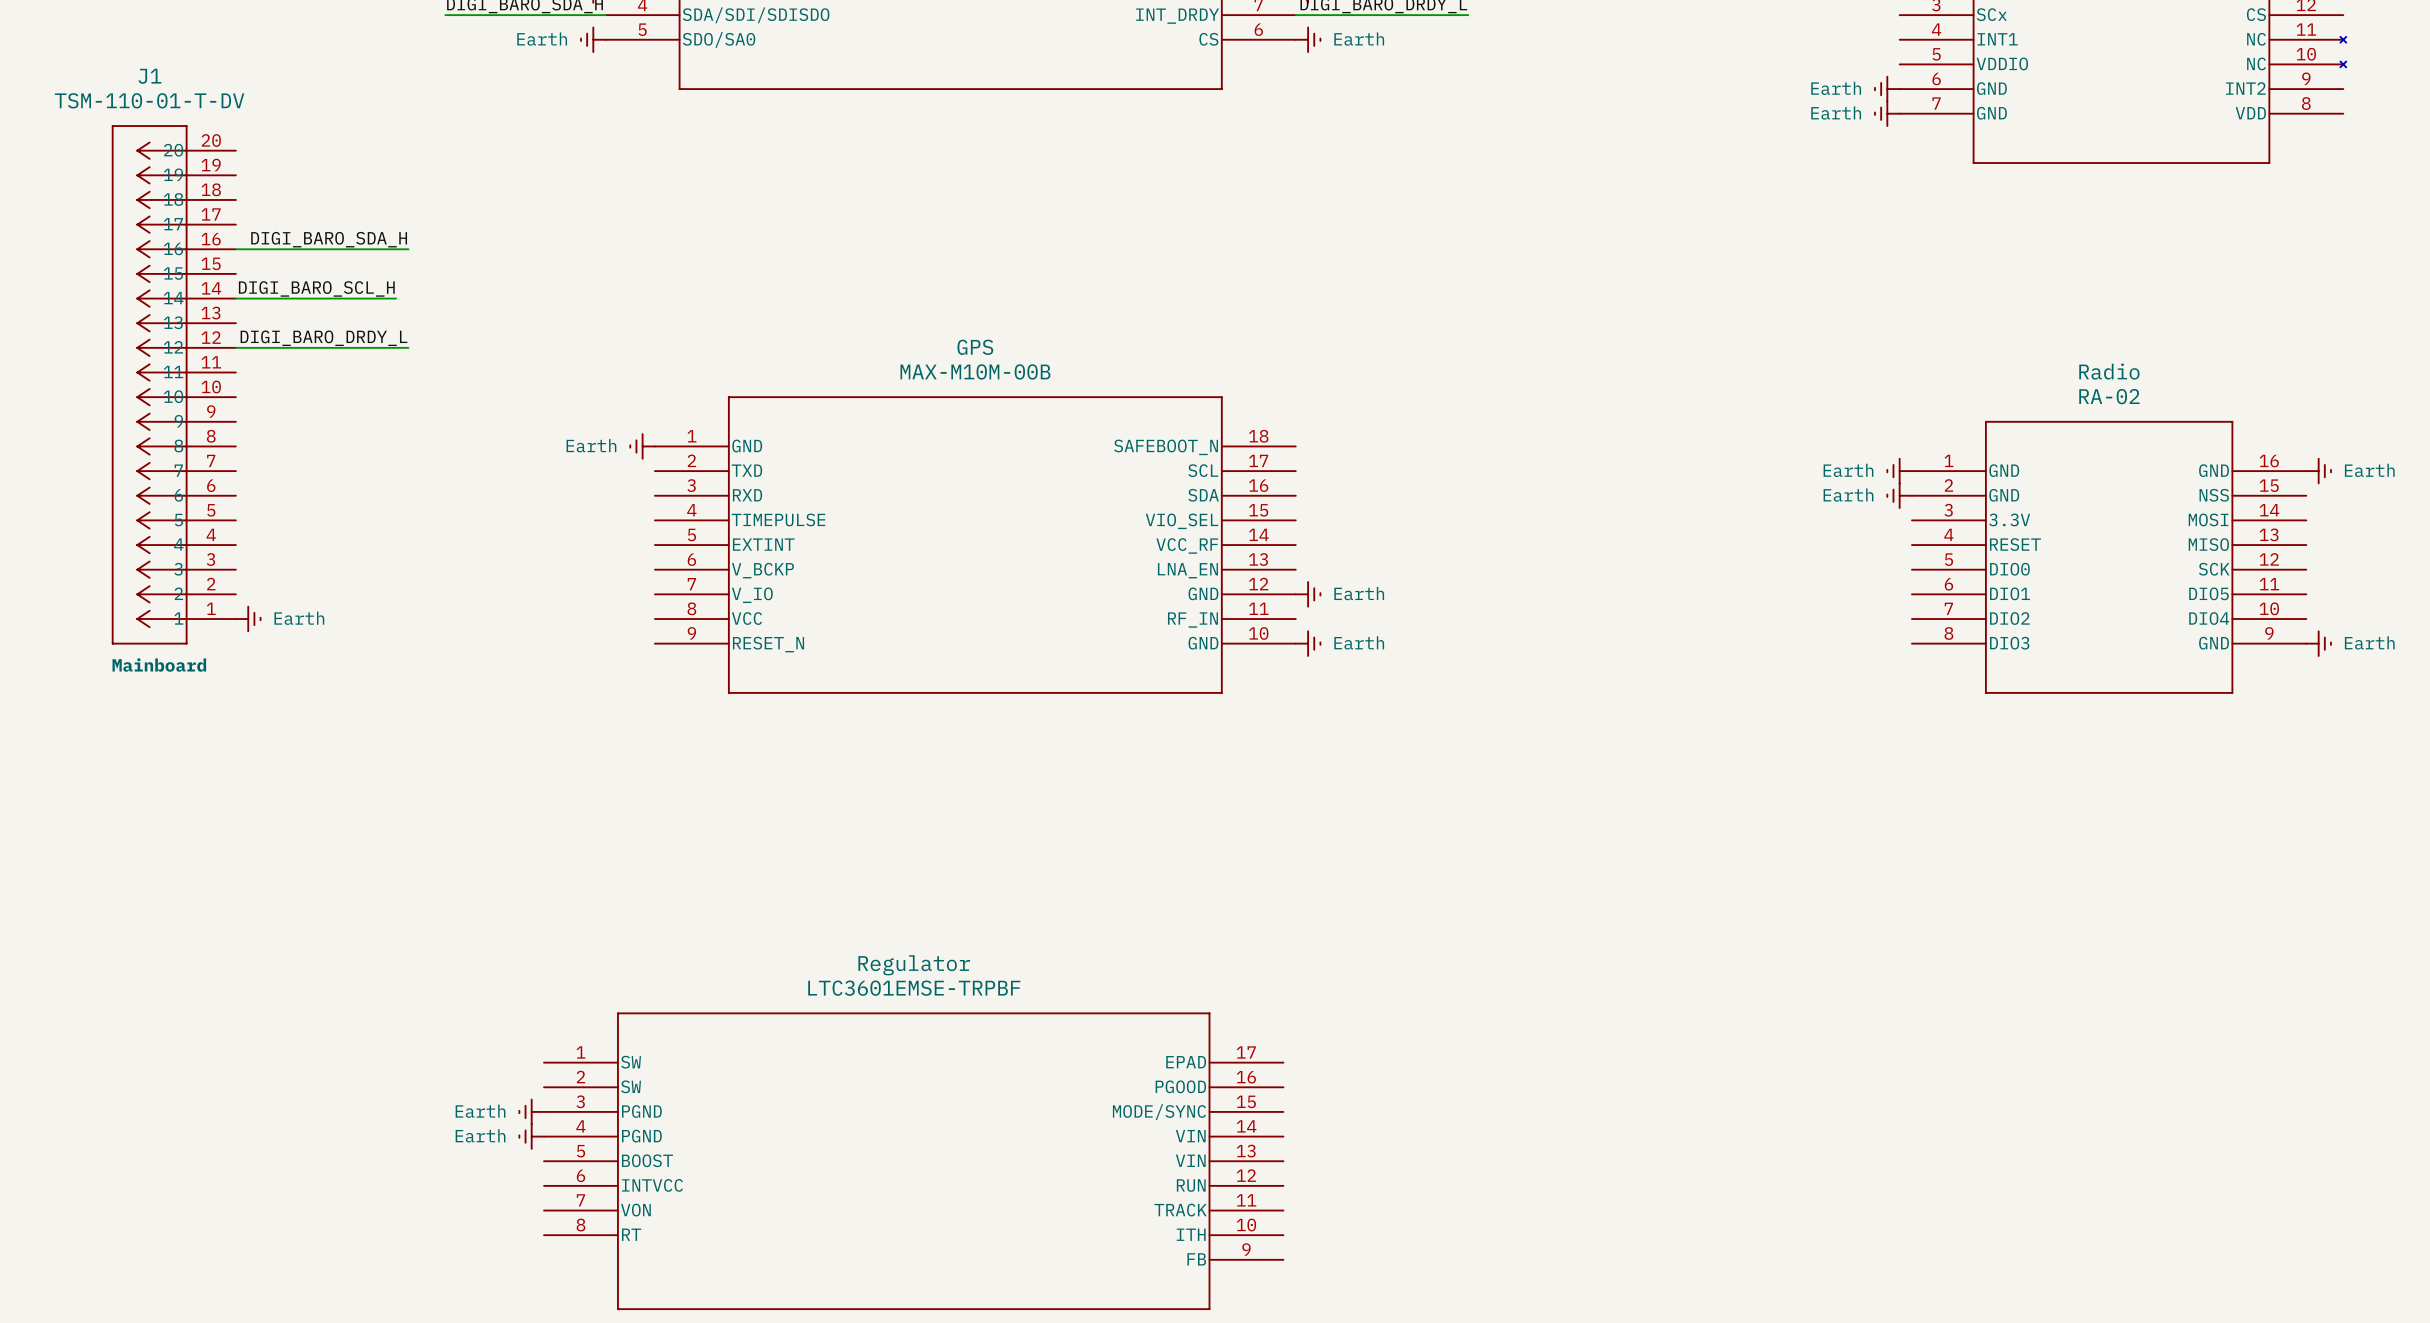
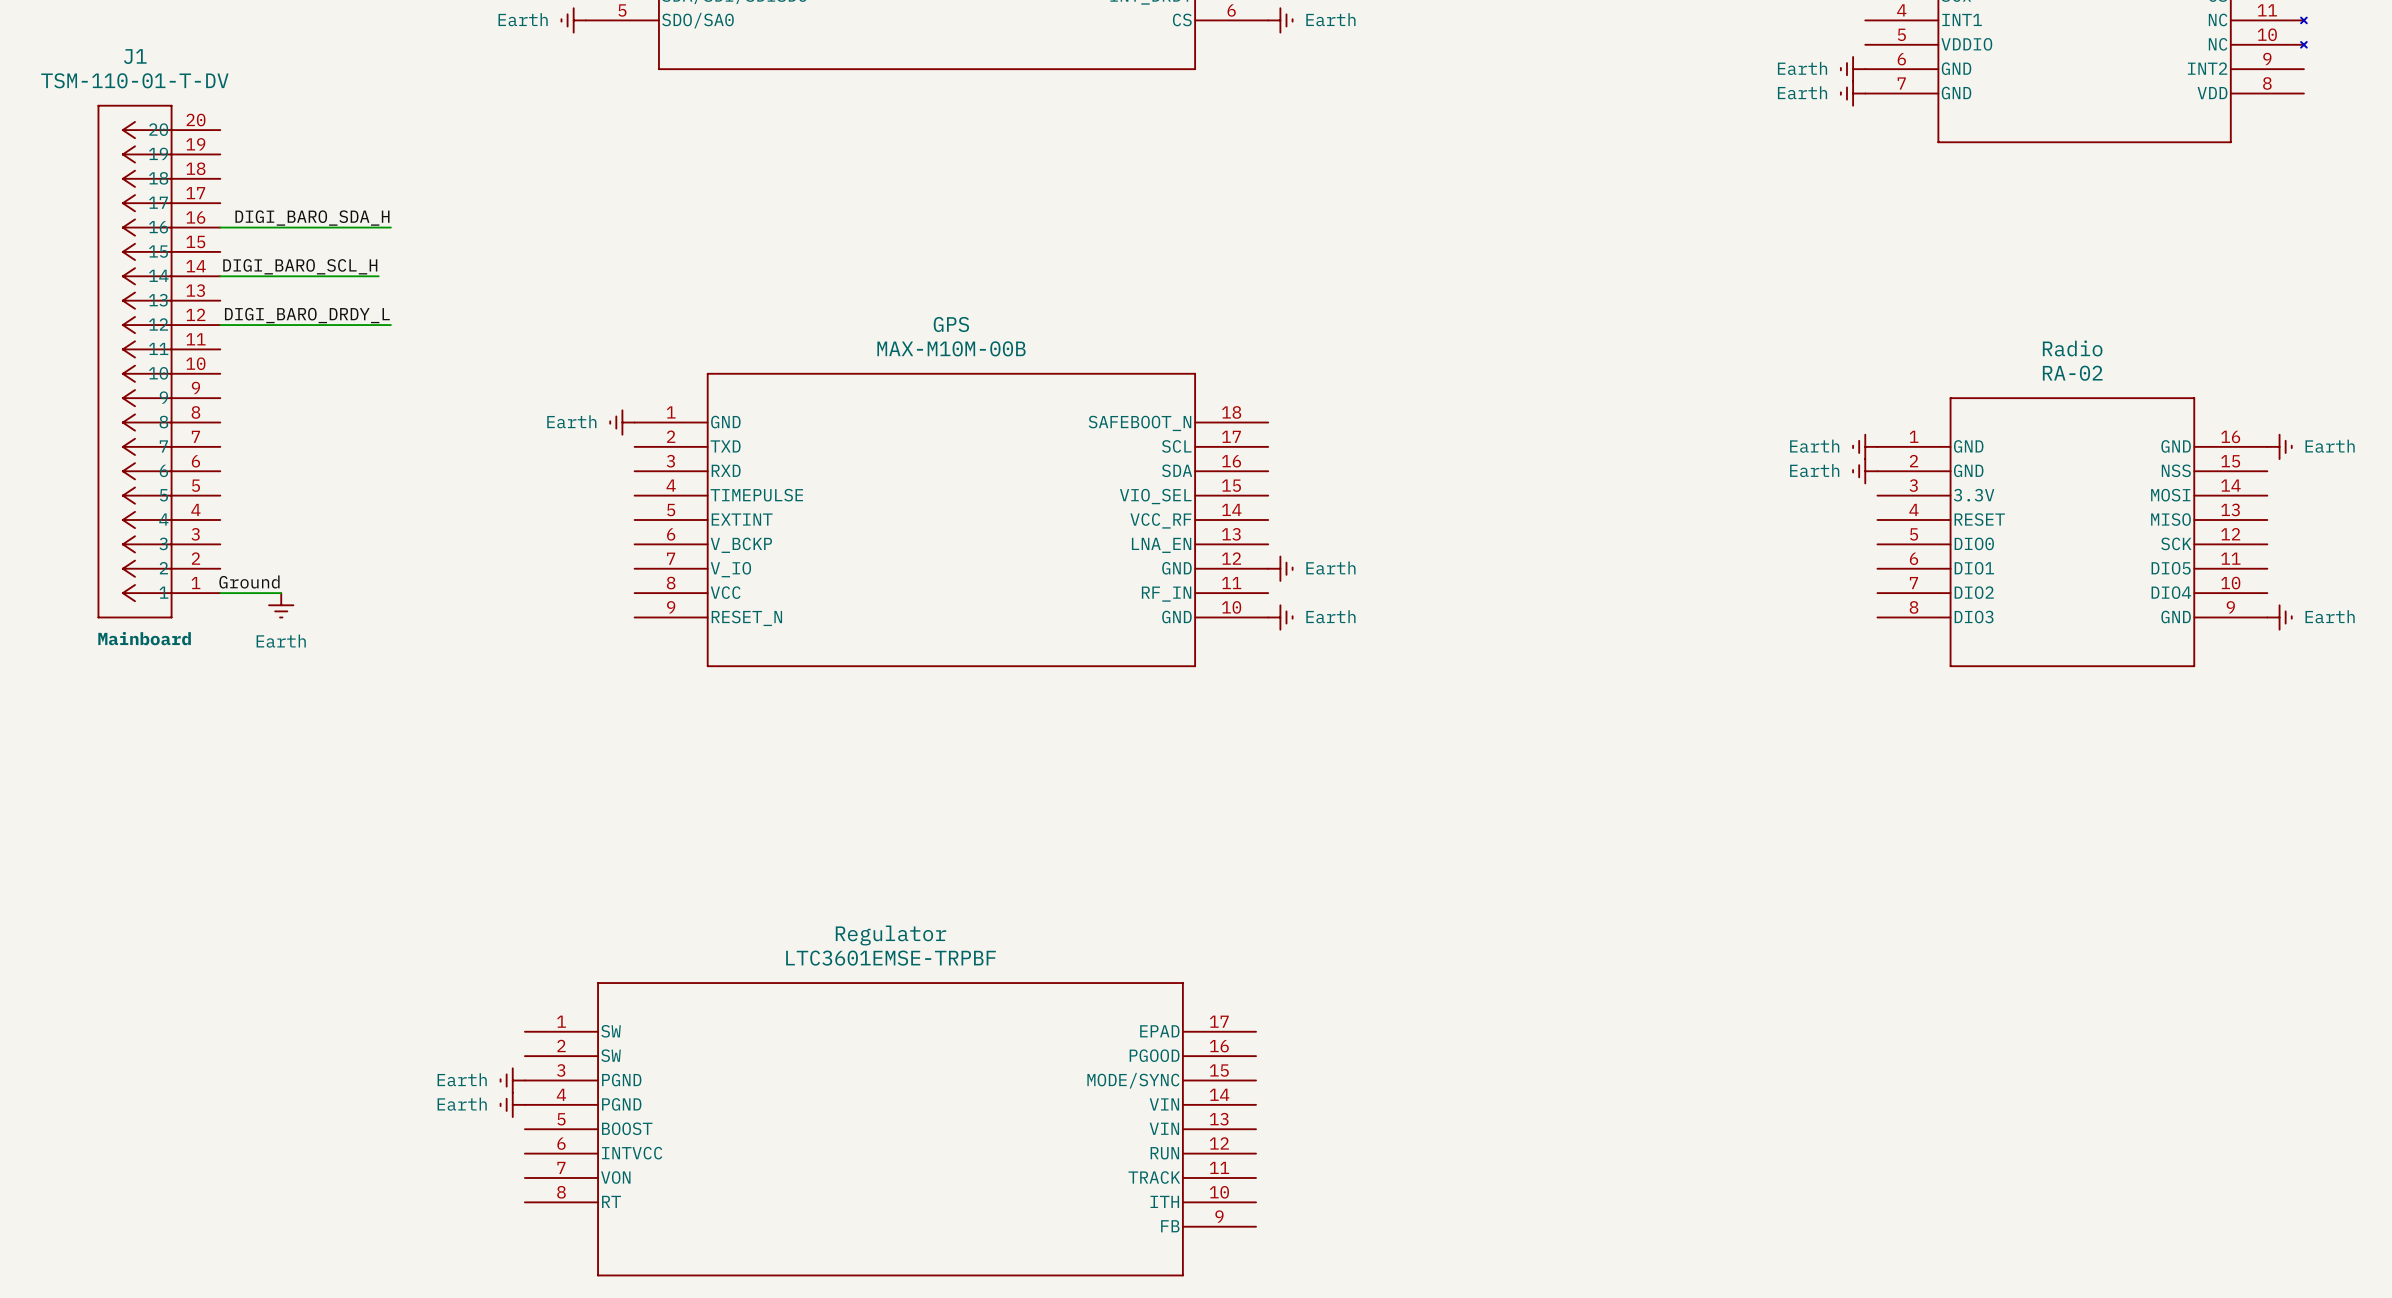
label: none -> Ground (249, 581)
wire: none -> (220, 593) (281, 593)
power symbol rotation: 0° (248, 618) -> 90° clockwise (281, 605)
power symbol position: Earth (248, 618) -> Earth (281, 605)
power symbol text position: Earth (299, 618) -> Earth (281, 641)

